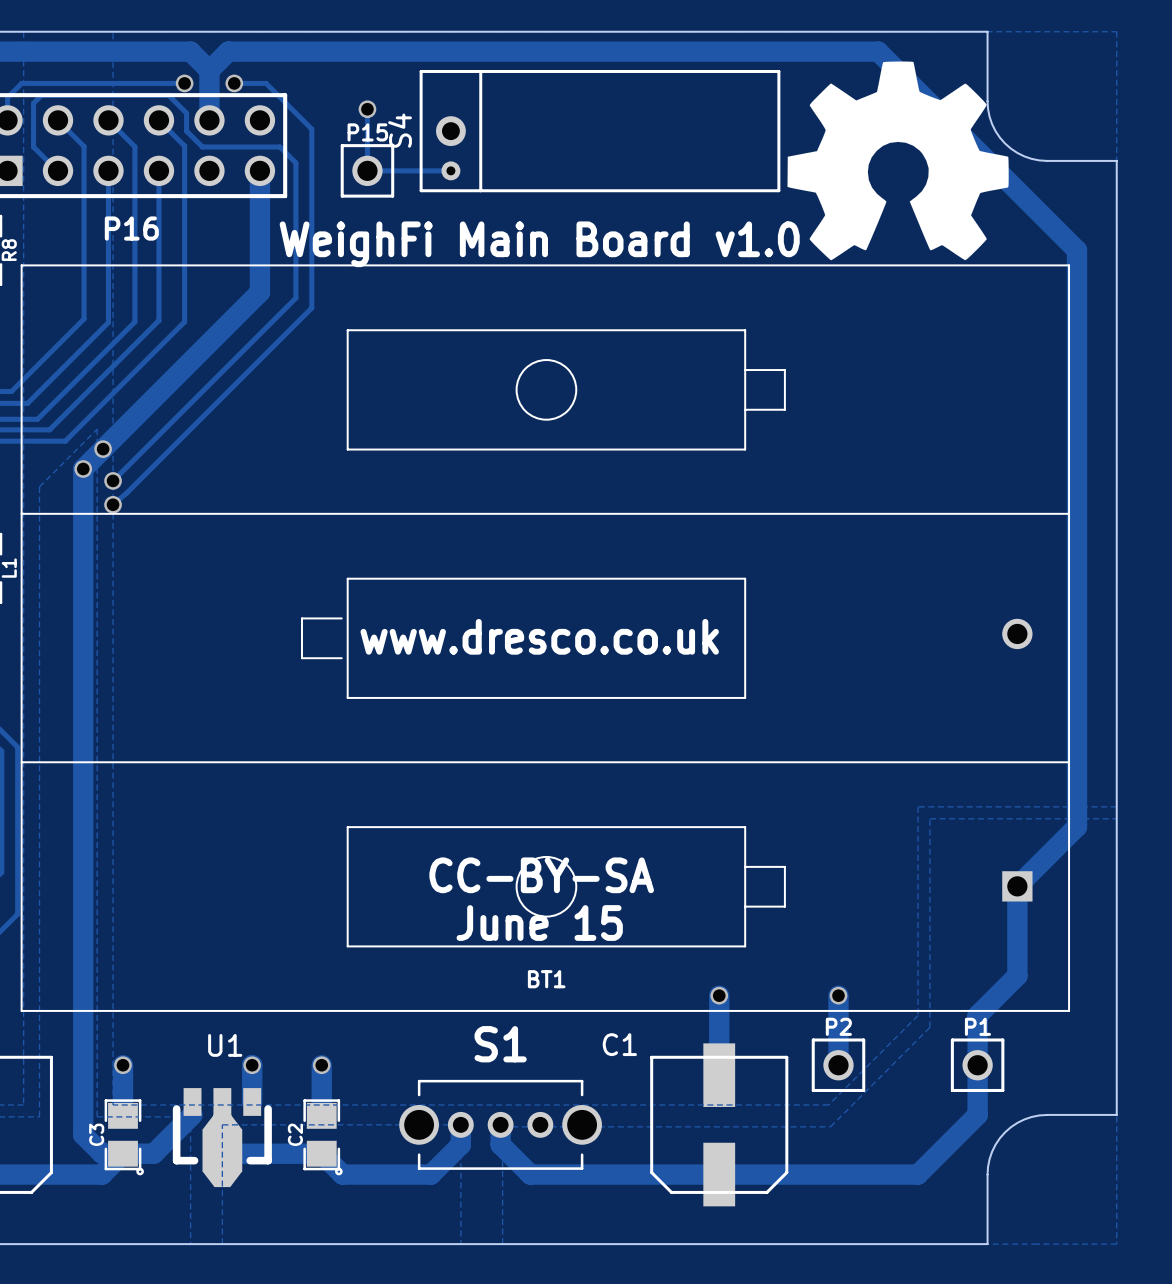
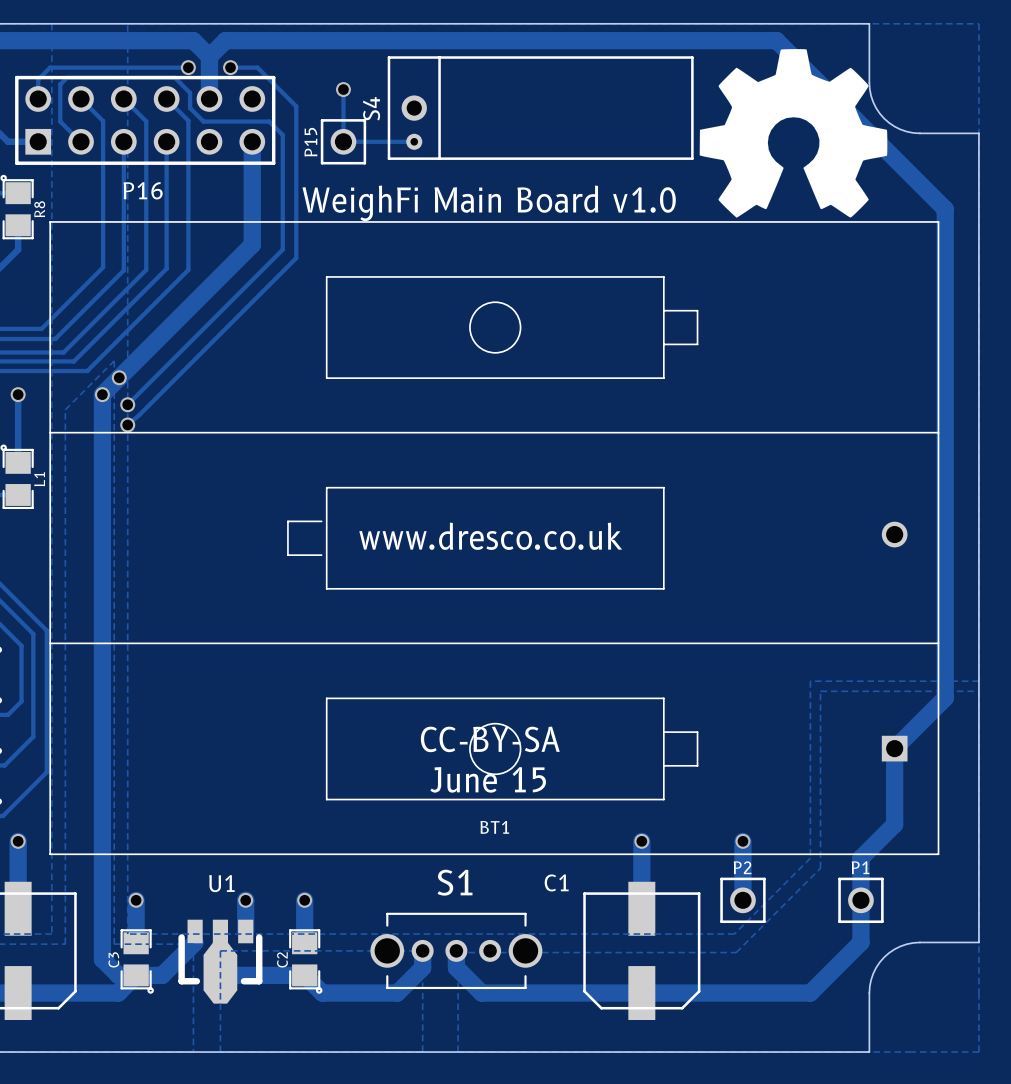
P15 name rotation: 0° (367, 132) -> 90° counterclockwise (310, 142)
P15 name position: P15 (367, 132) -> P15 (310, 142)

